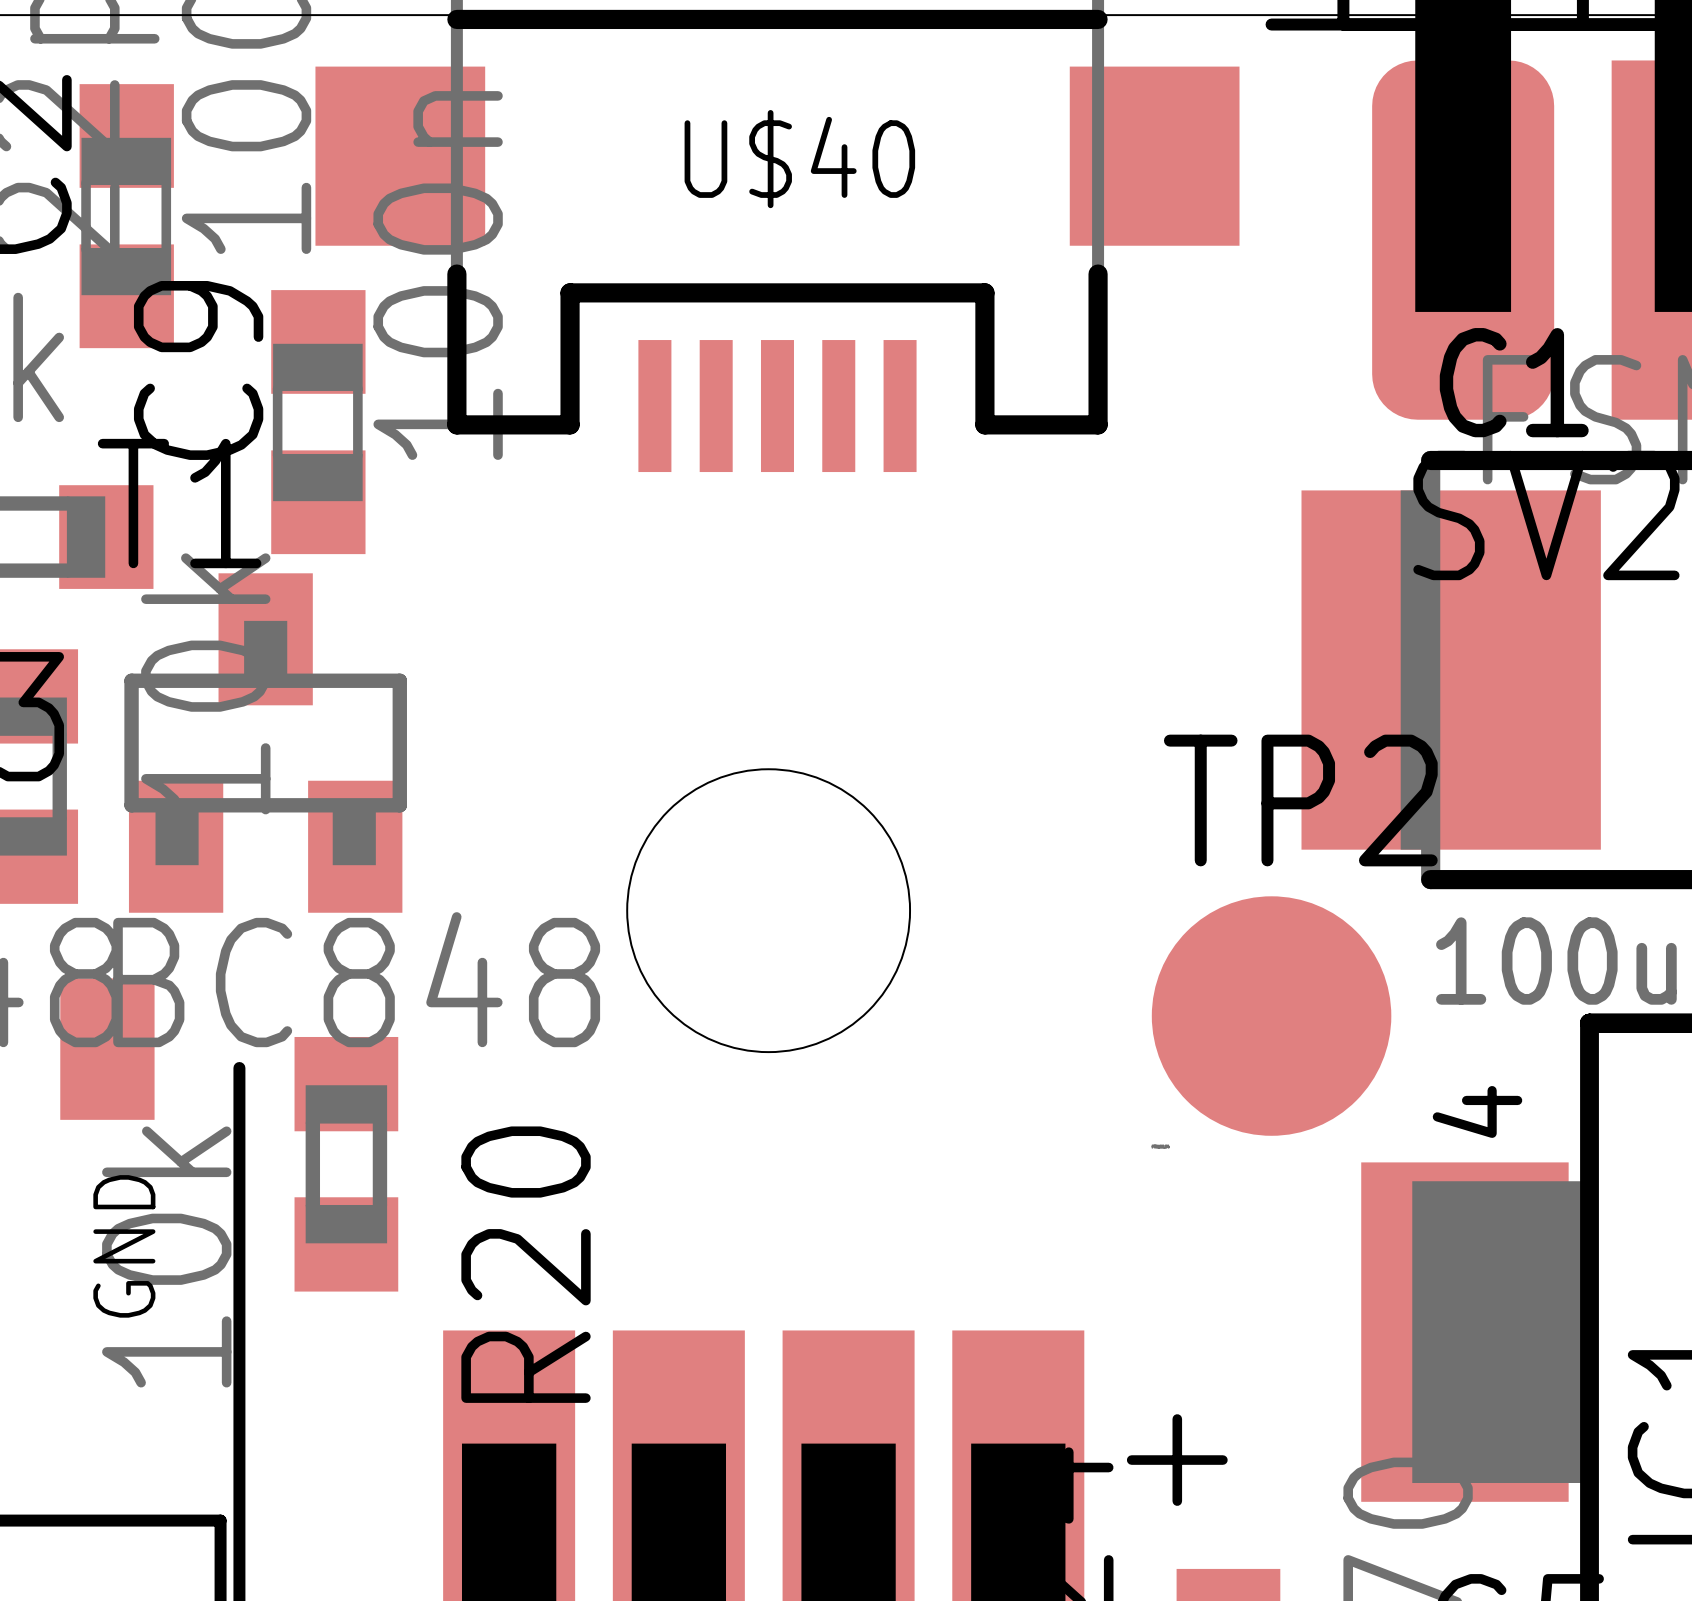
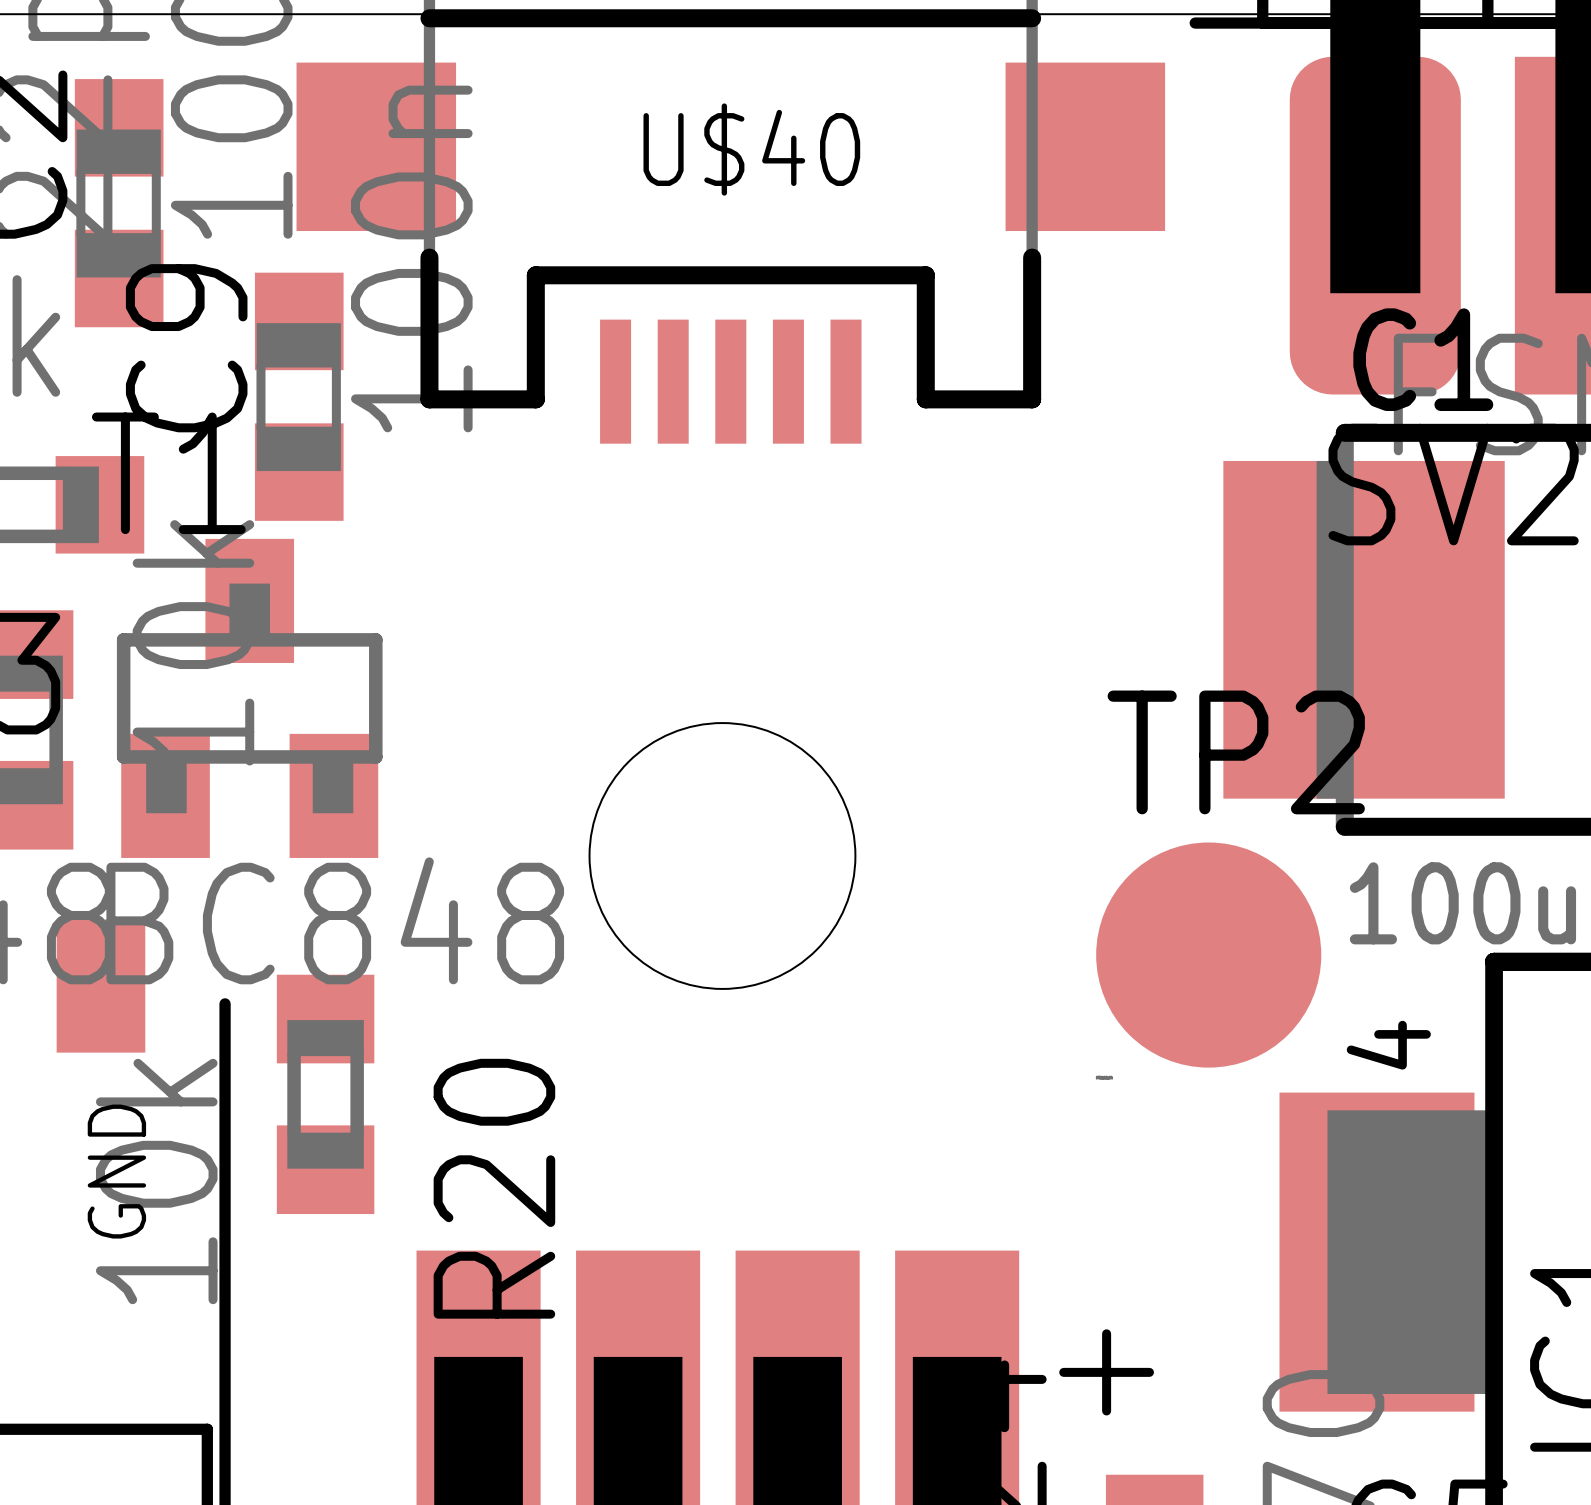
TP2 position: (1271, 1016) -> (1208, 955)

